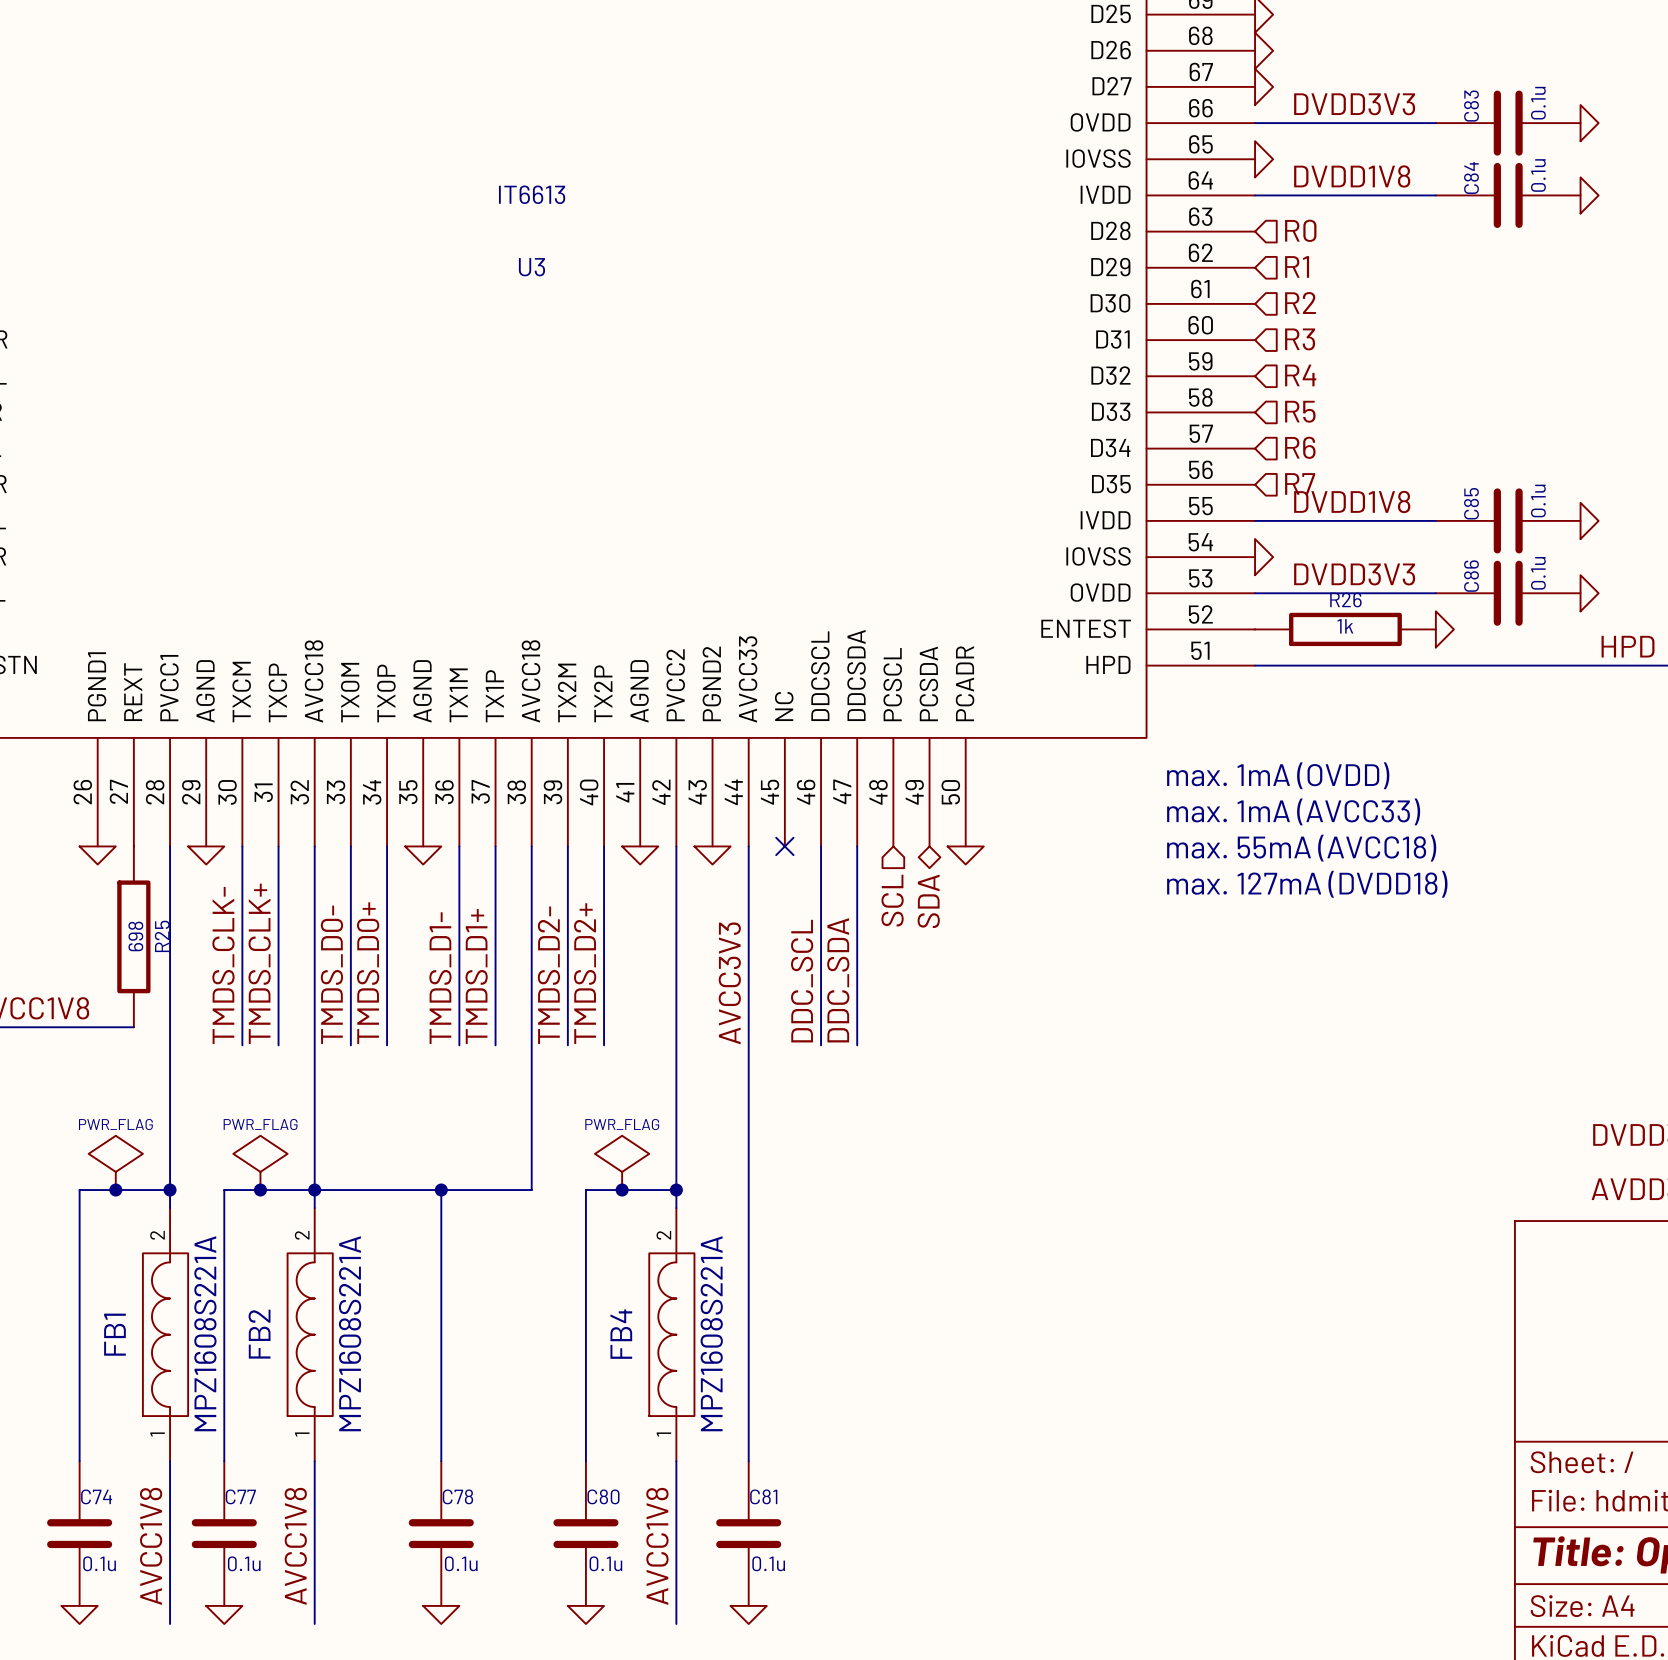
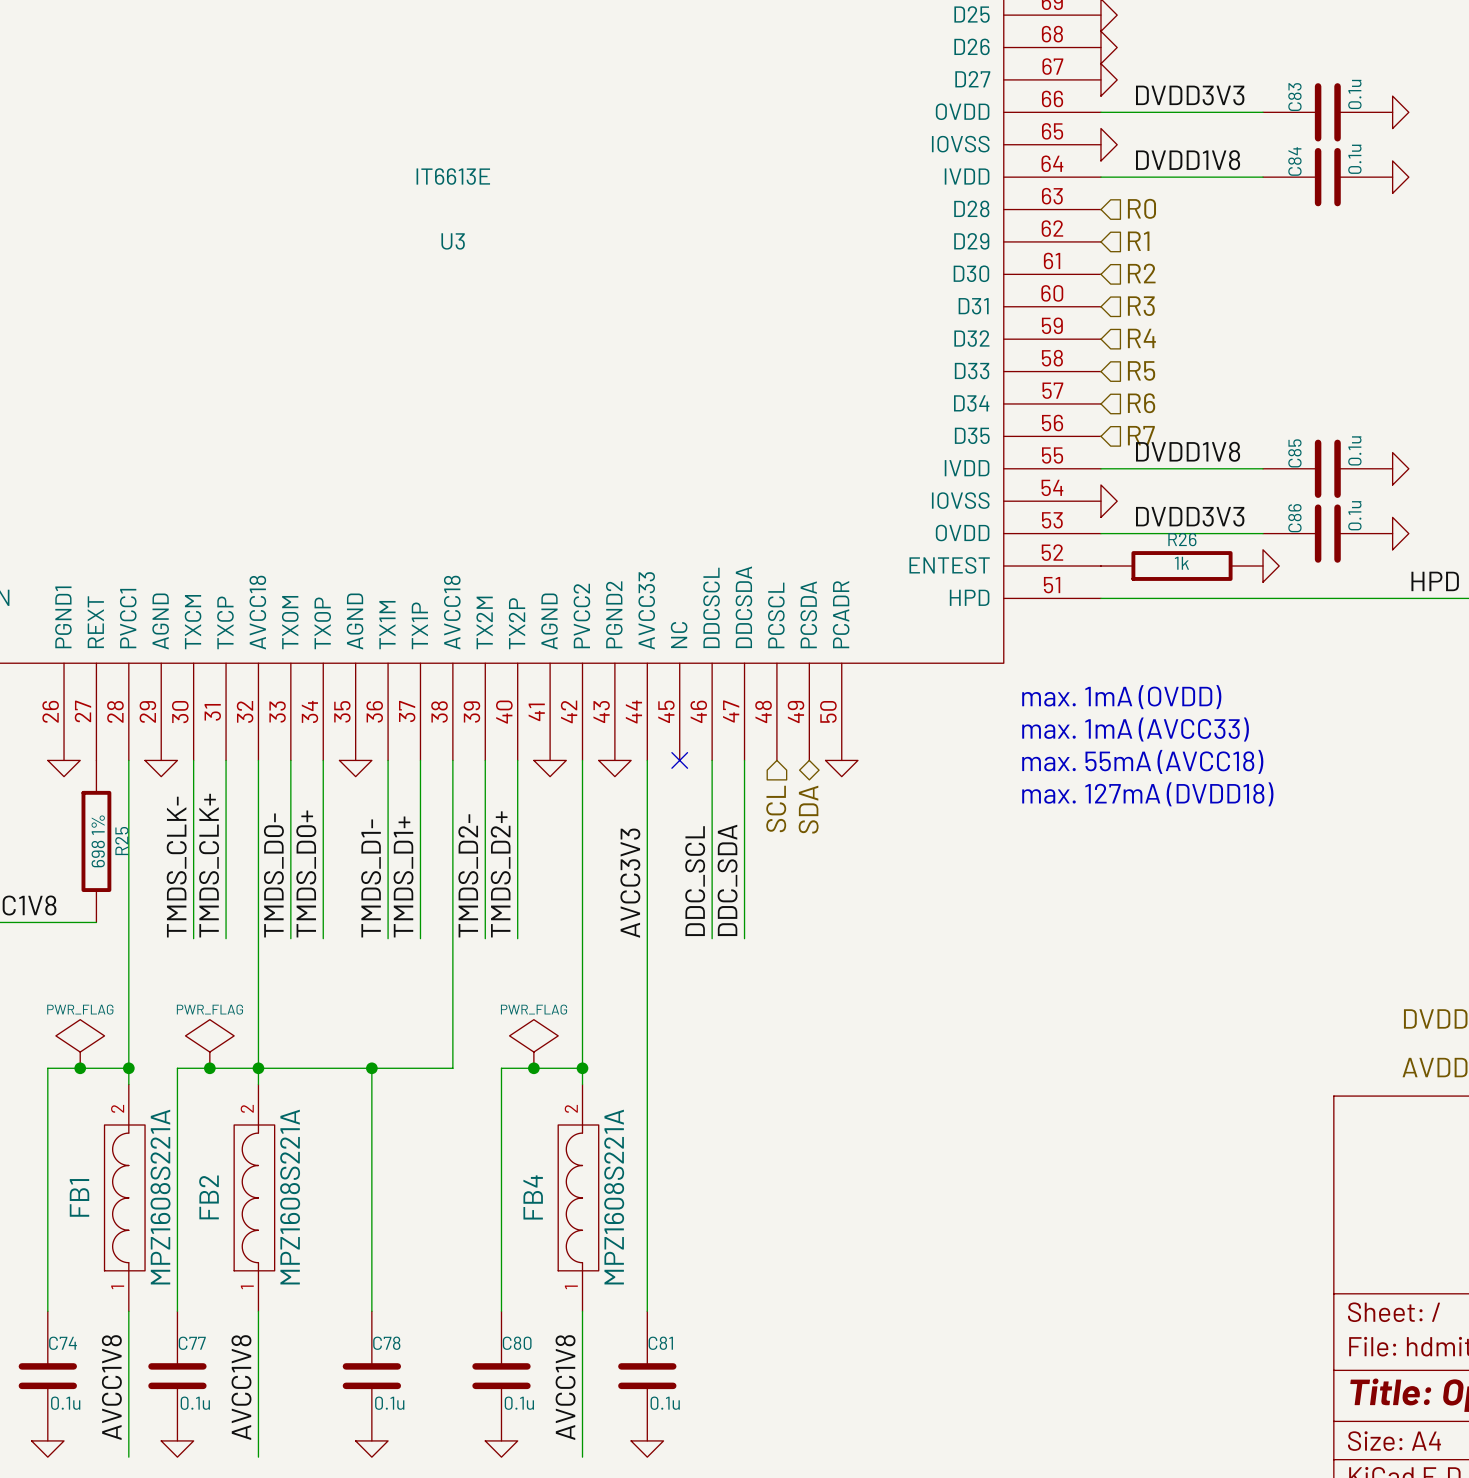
U3 value: IT6613 (532, 194) -> IT6613E (453, 176)
R25 value: 698 (135, 936) -> 698 1% (98, 841)

